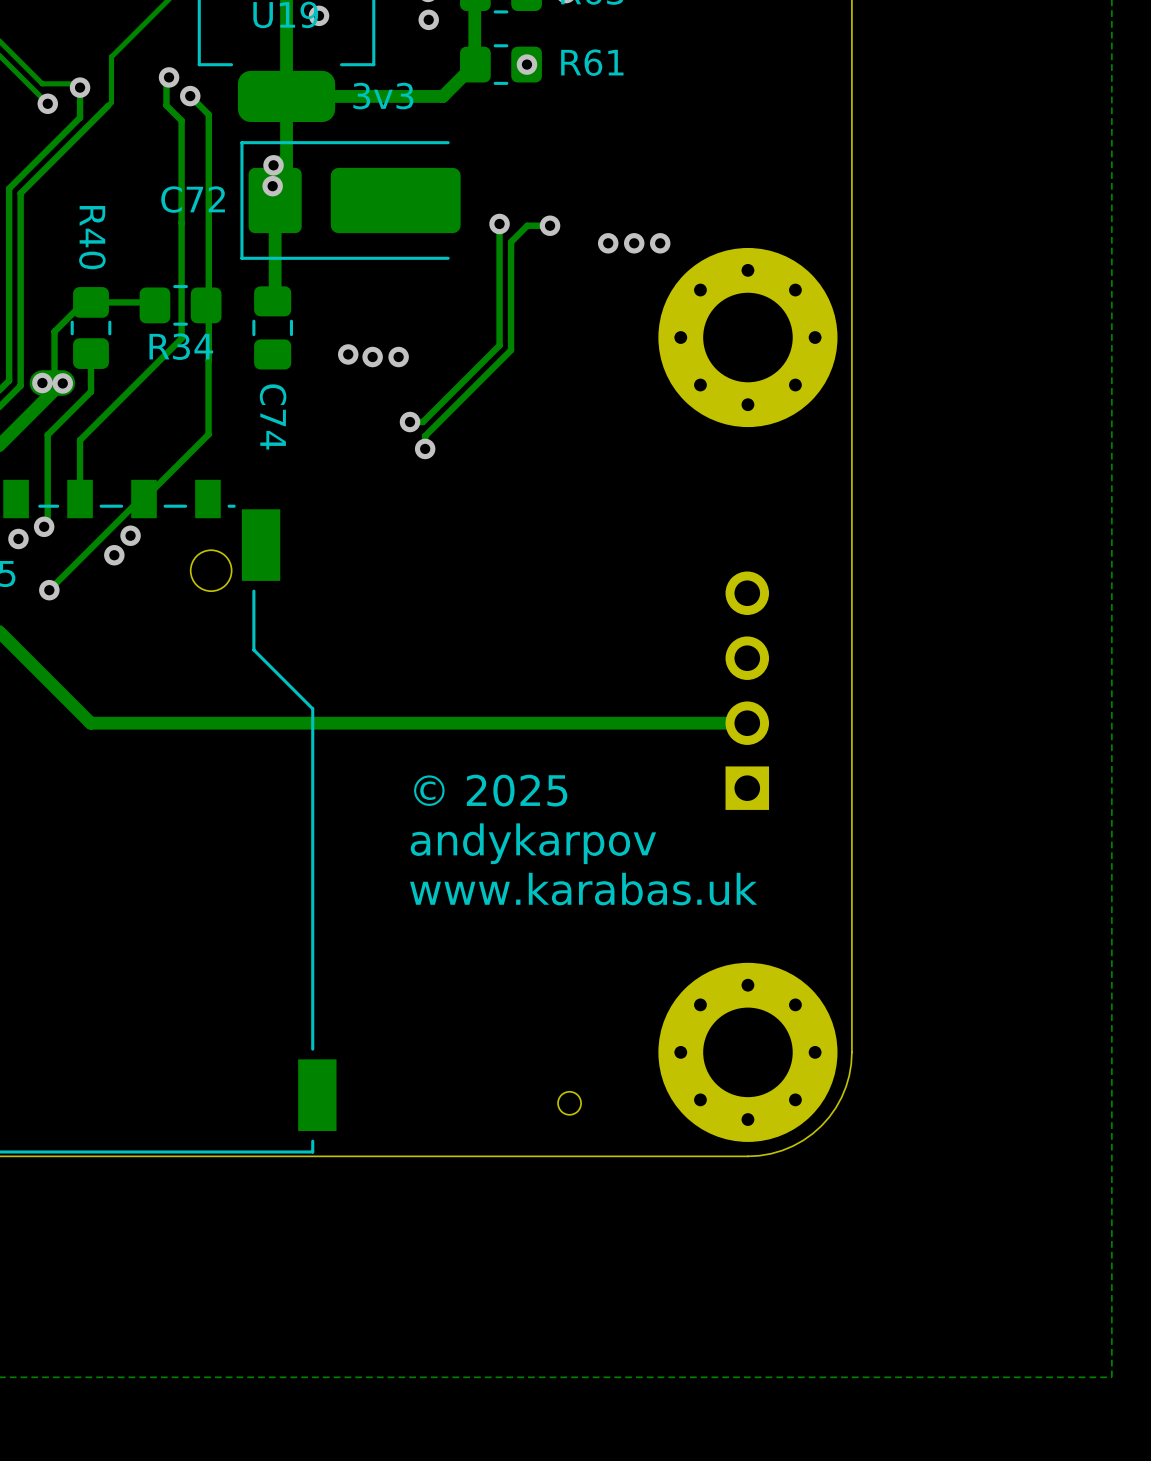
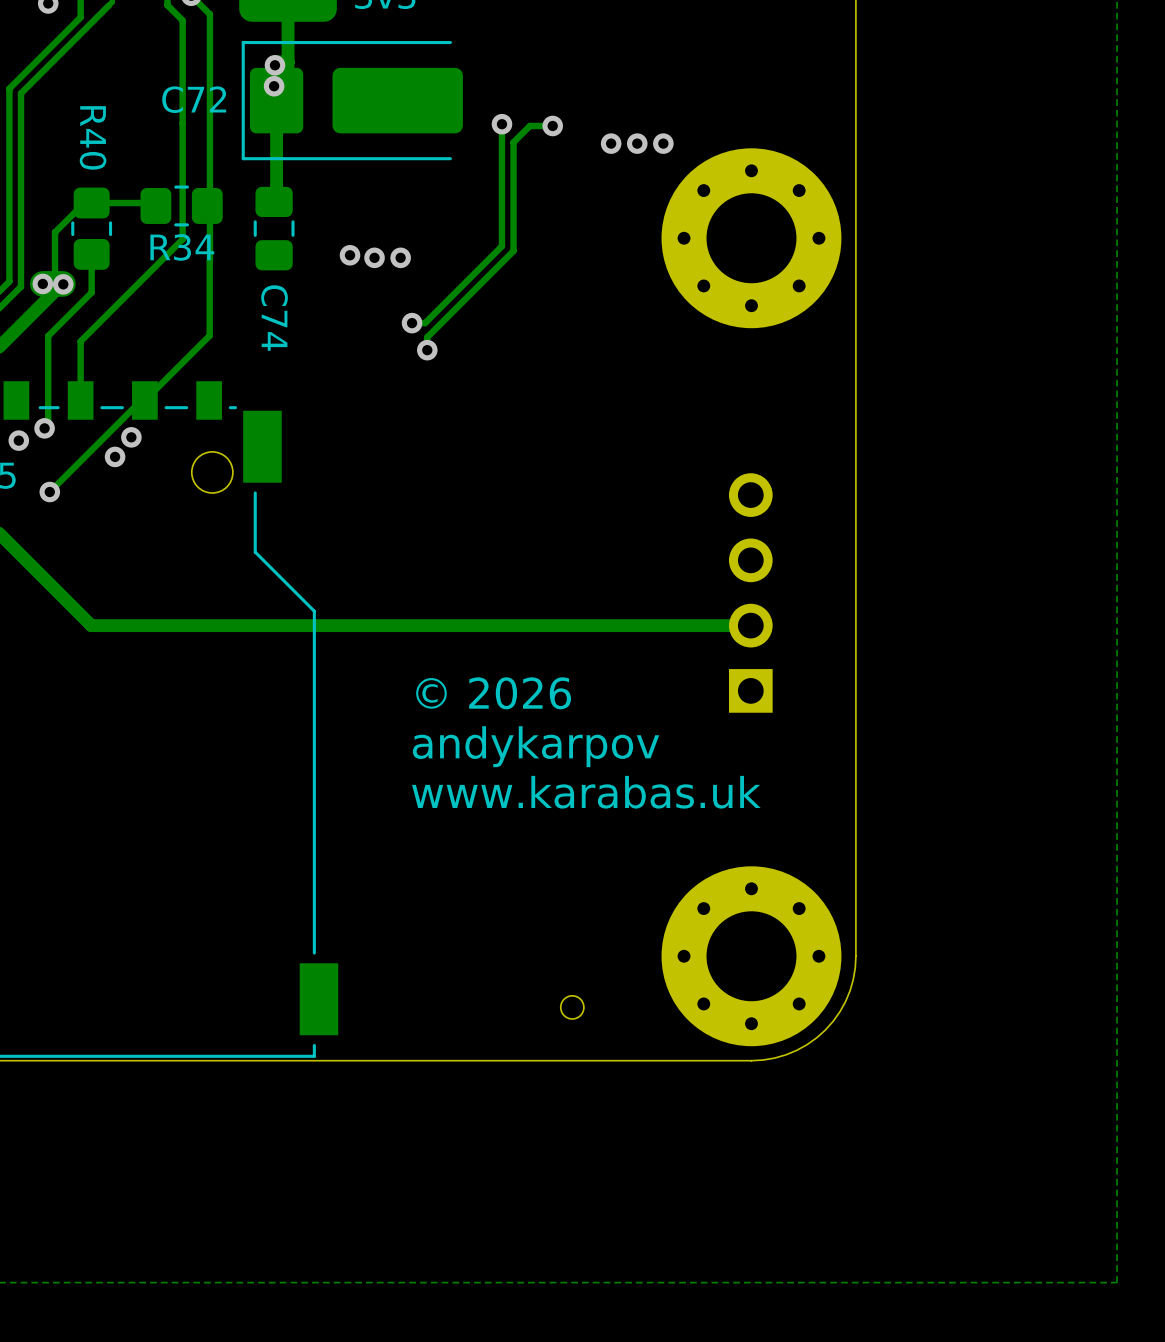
text: © 2025 (490, 790) -> © 2026 (493, 693)

